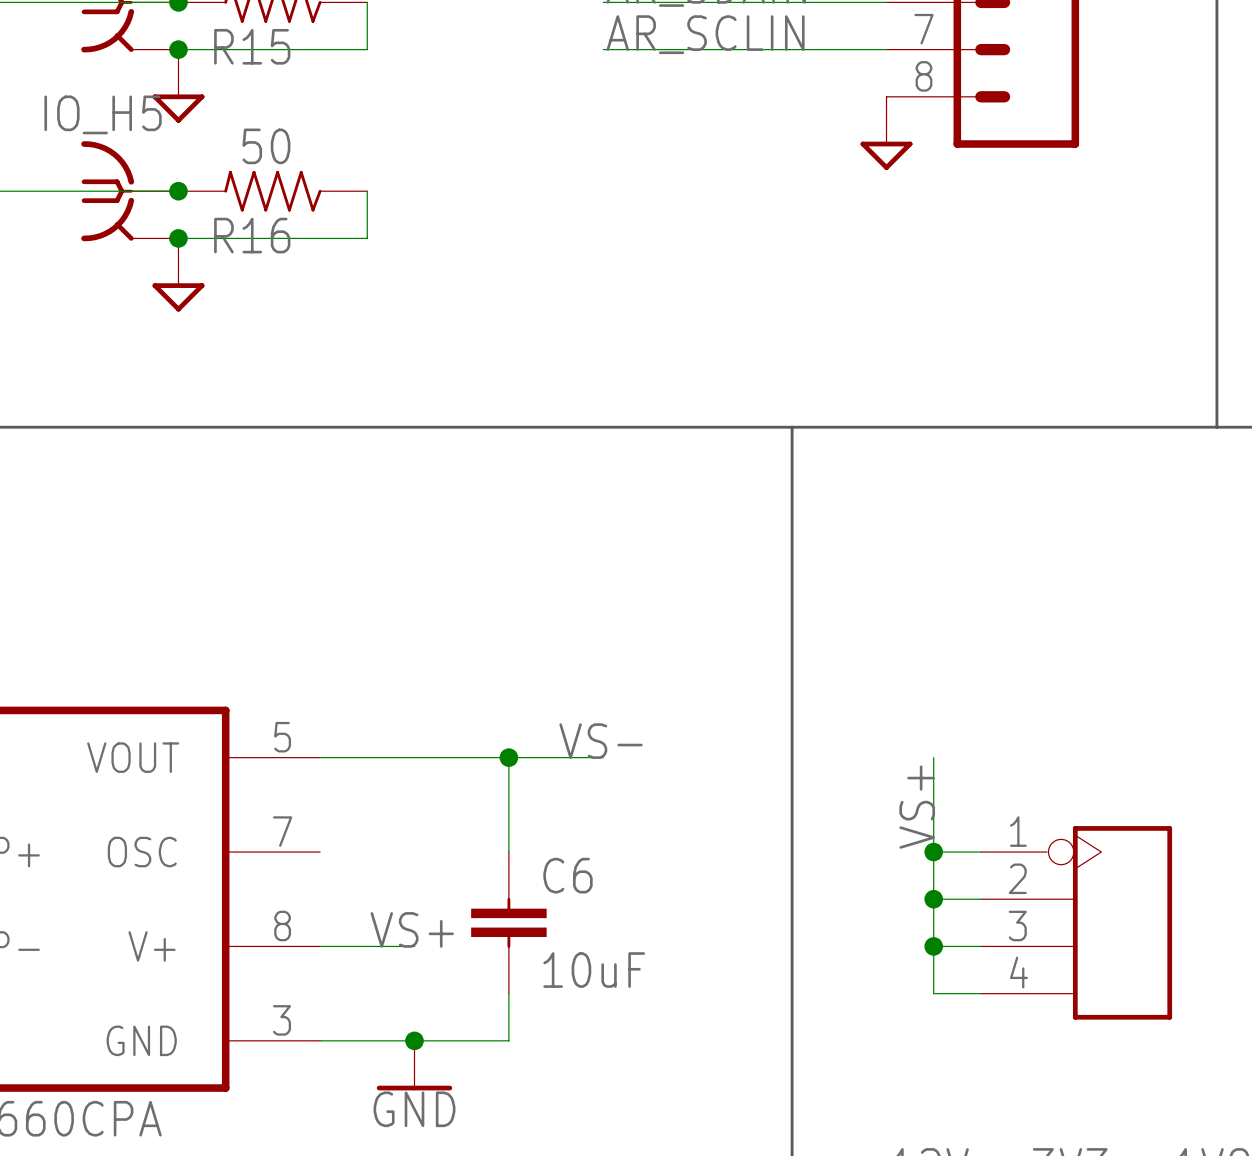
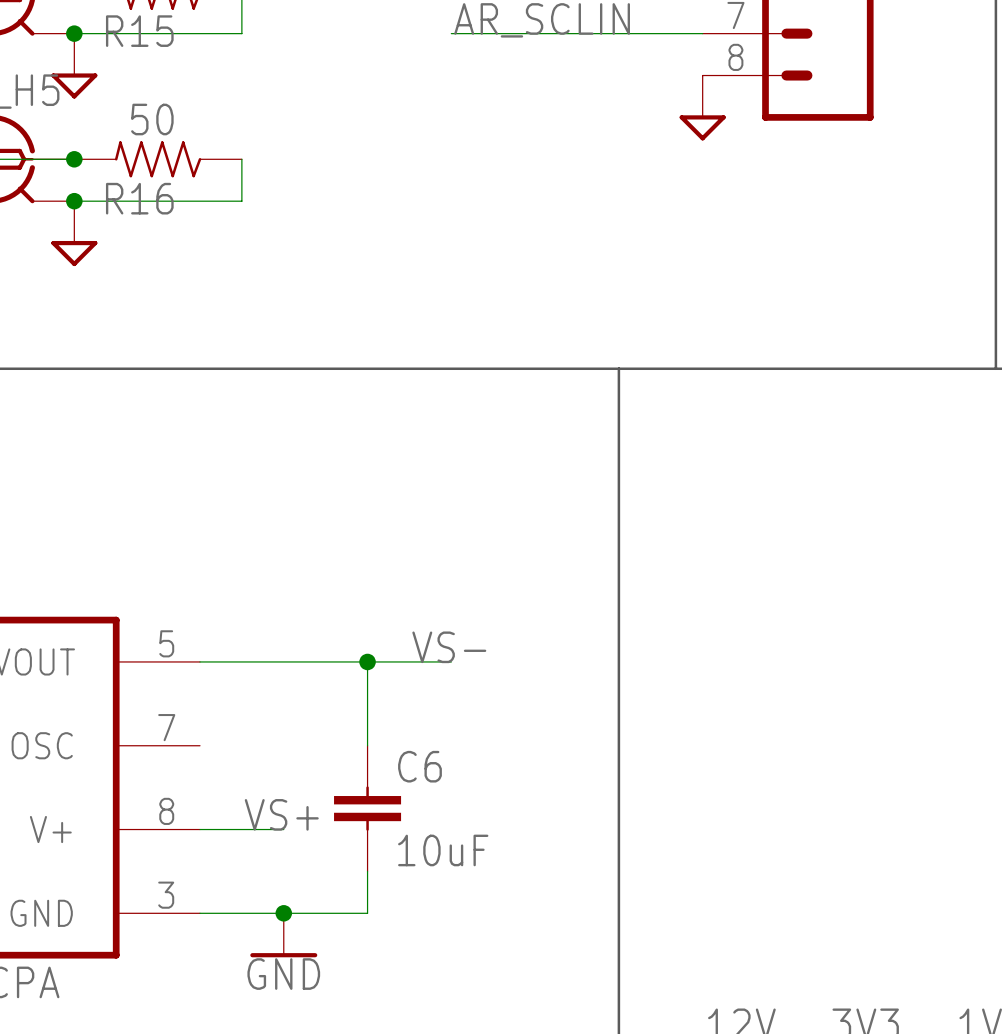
wire: (933, 757) (933, 993) (980, 993) -> none
label: VS+ (917, 807) -> none
wire: (933, 852) (980, 852) -> none
junction: (933, 852) -> none
wire: (933, 899) (980, 899) -> none
junction: (933, 899) -> none
part: (1076, 922) -> none
wire: (933, 946) (980, 946) -> none
junction: (933, 946) -> none

